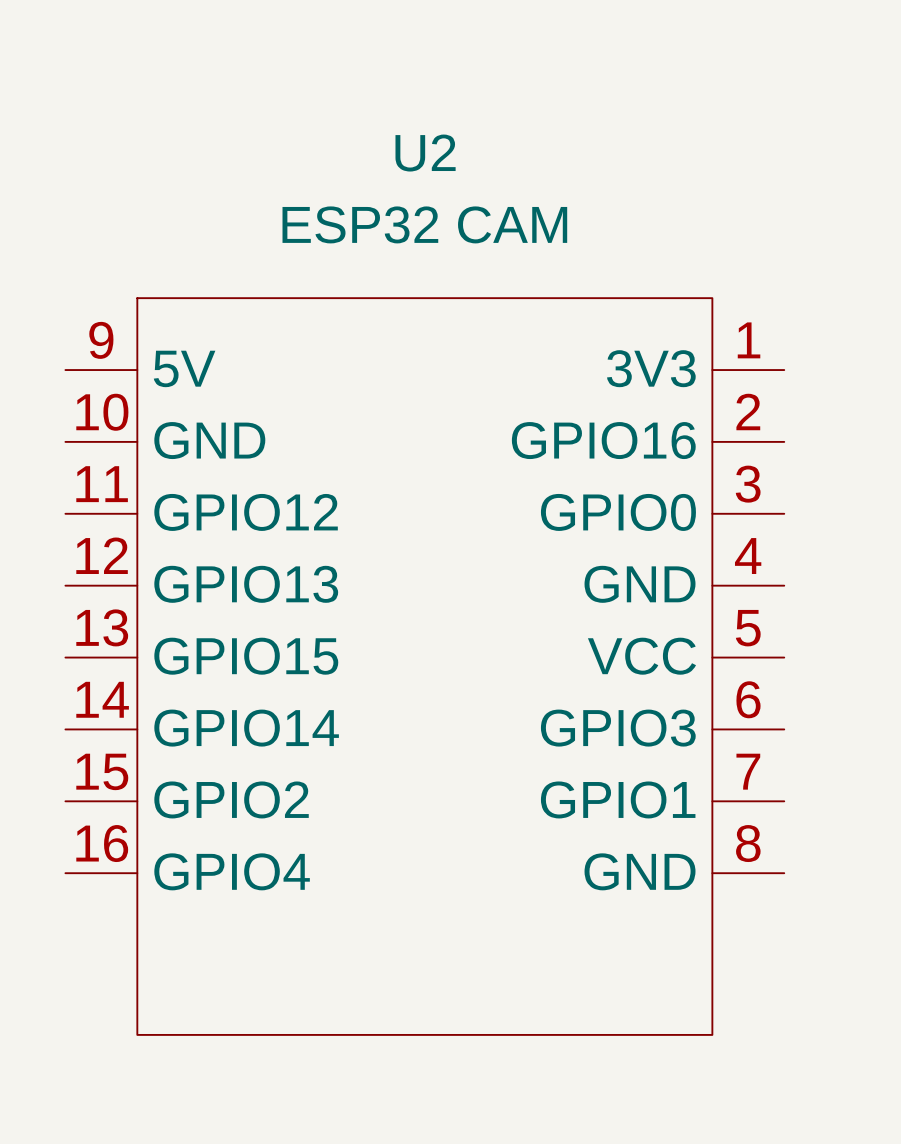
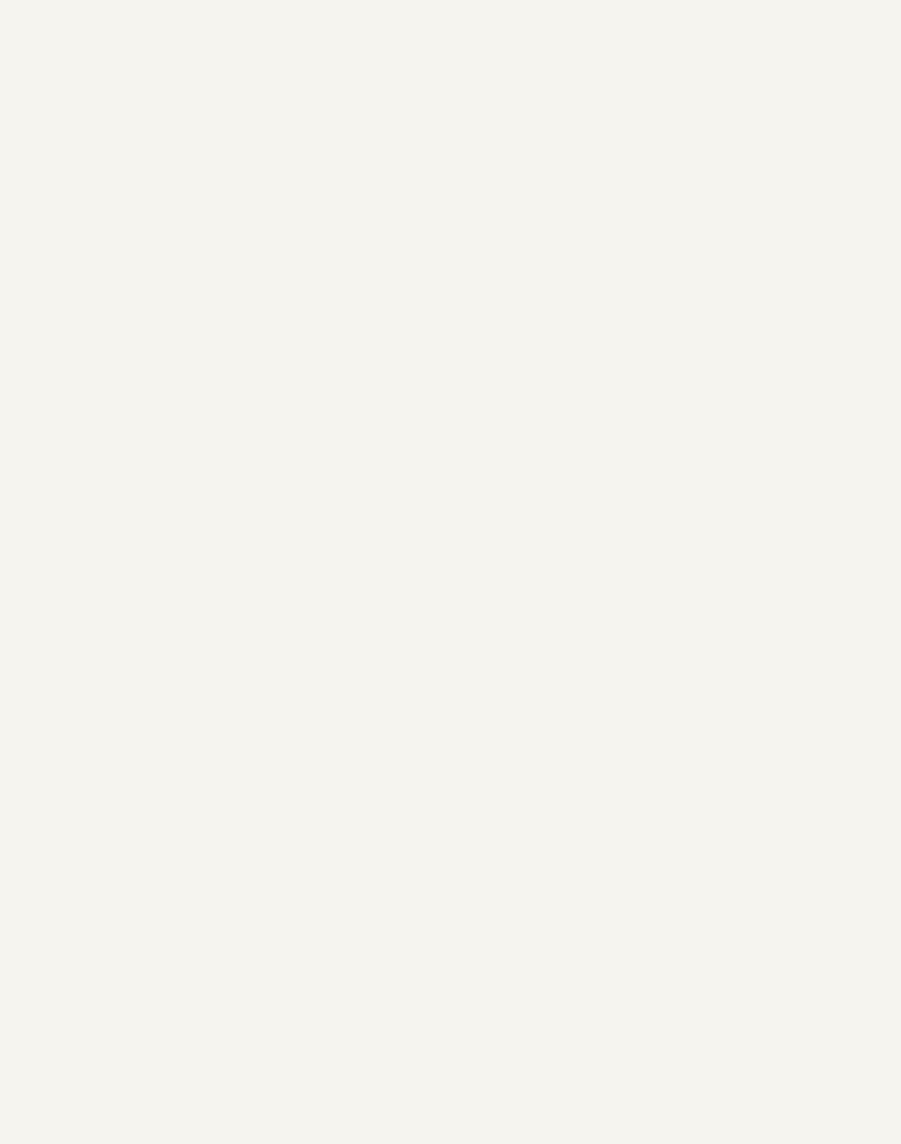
U2: ESP32 CAM (424, 666) -> none

